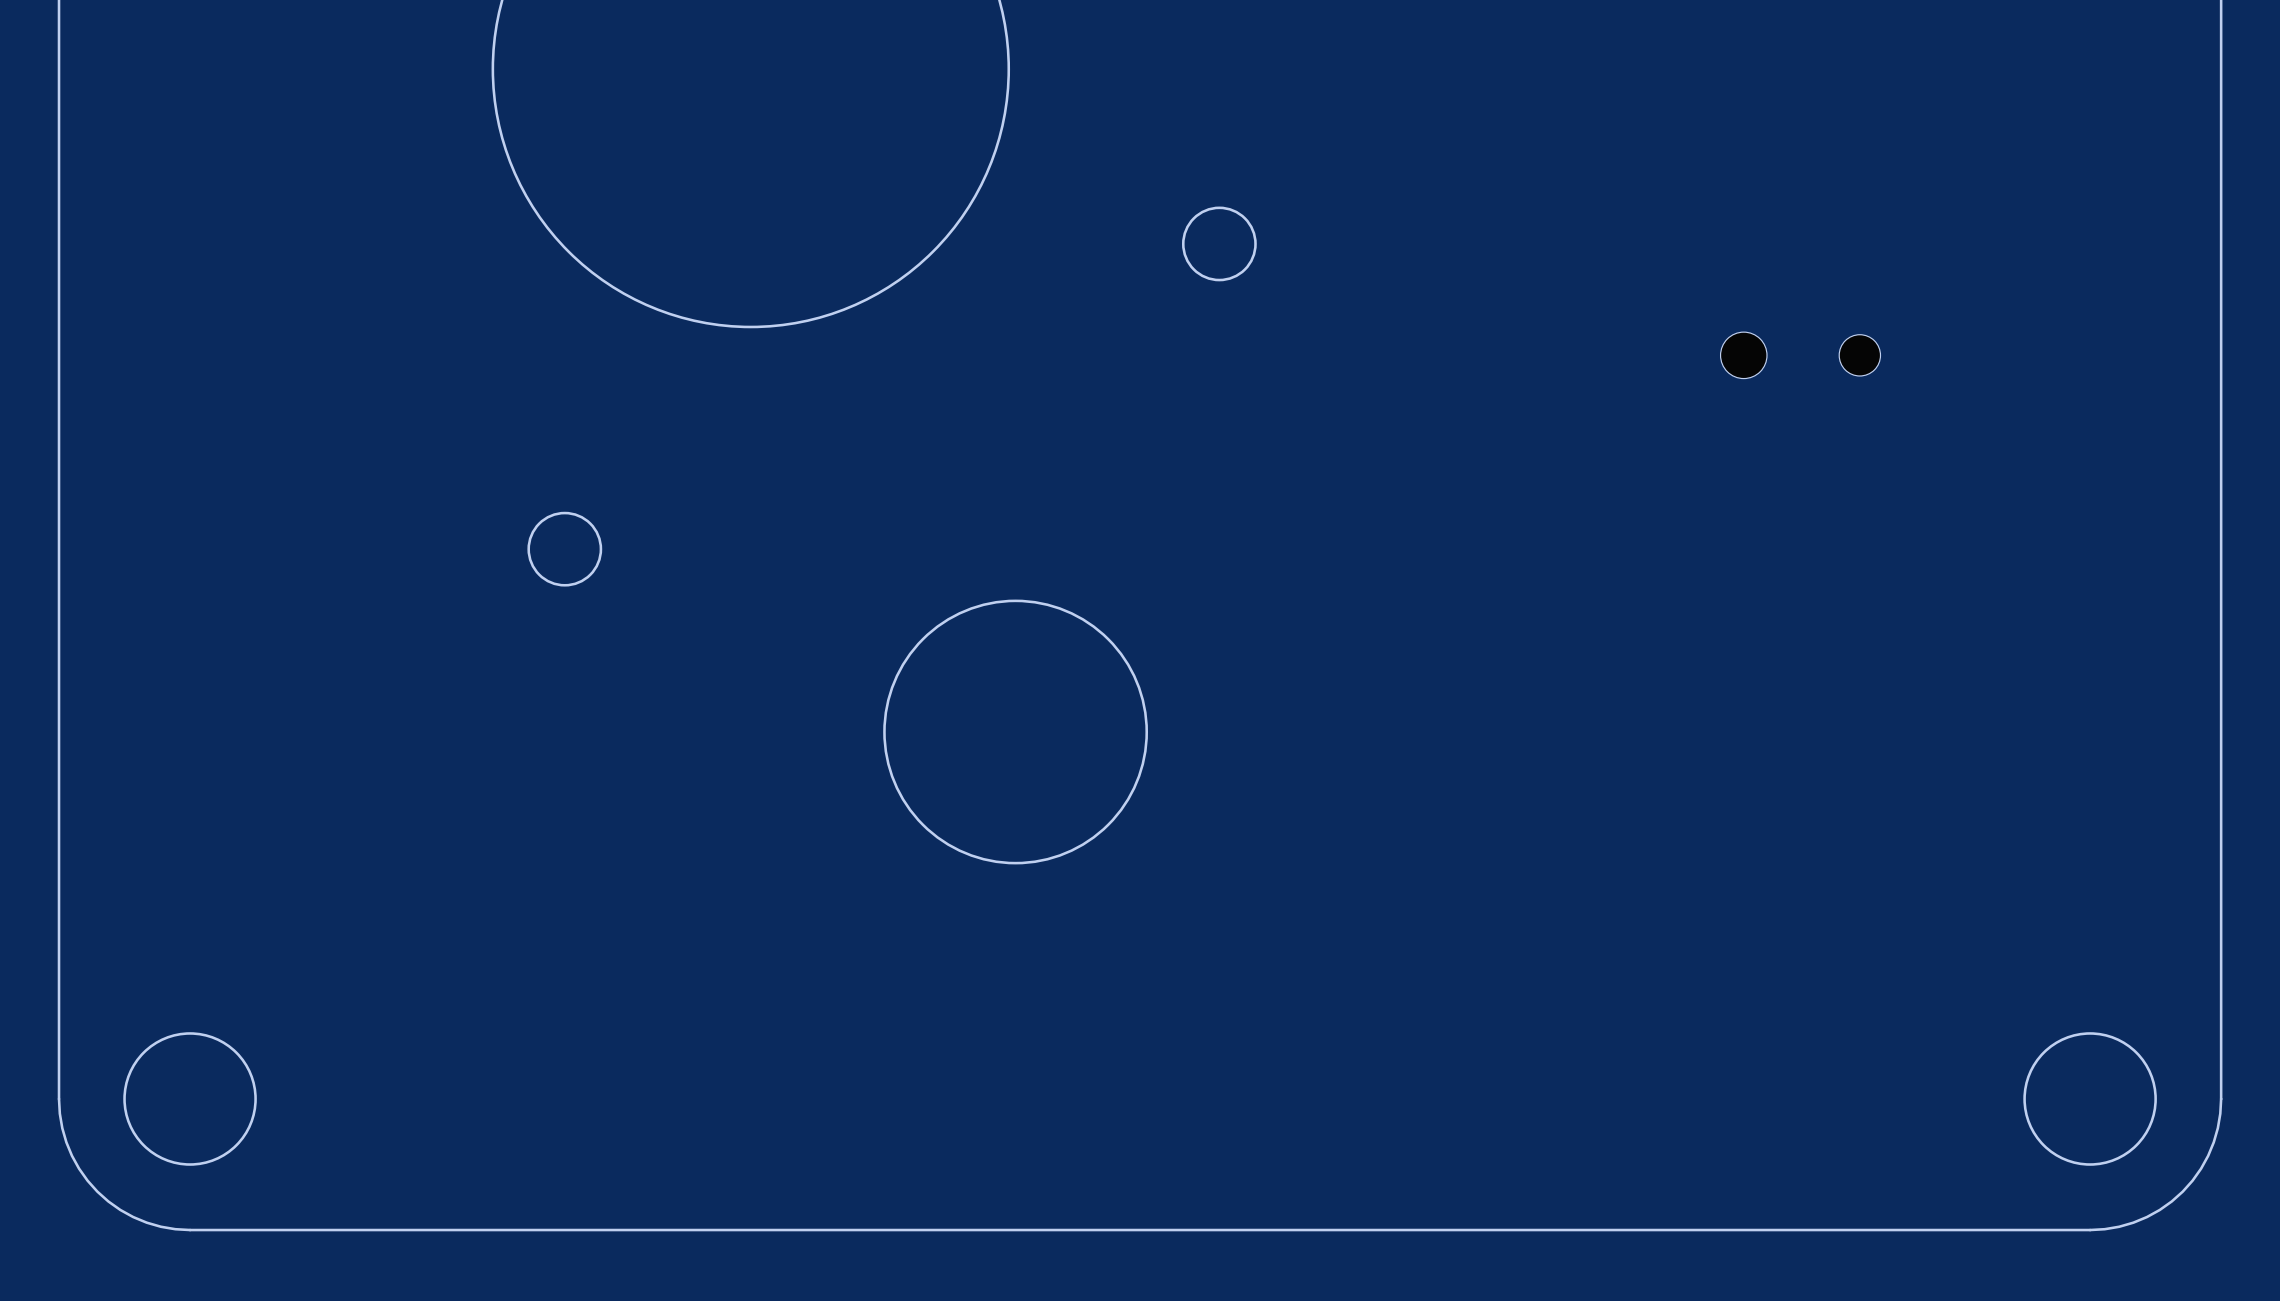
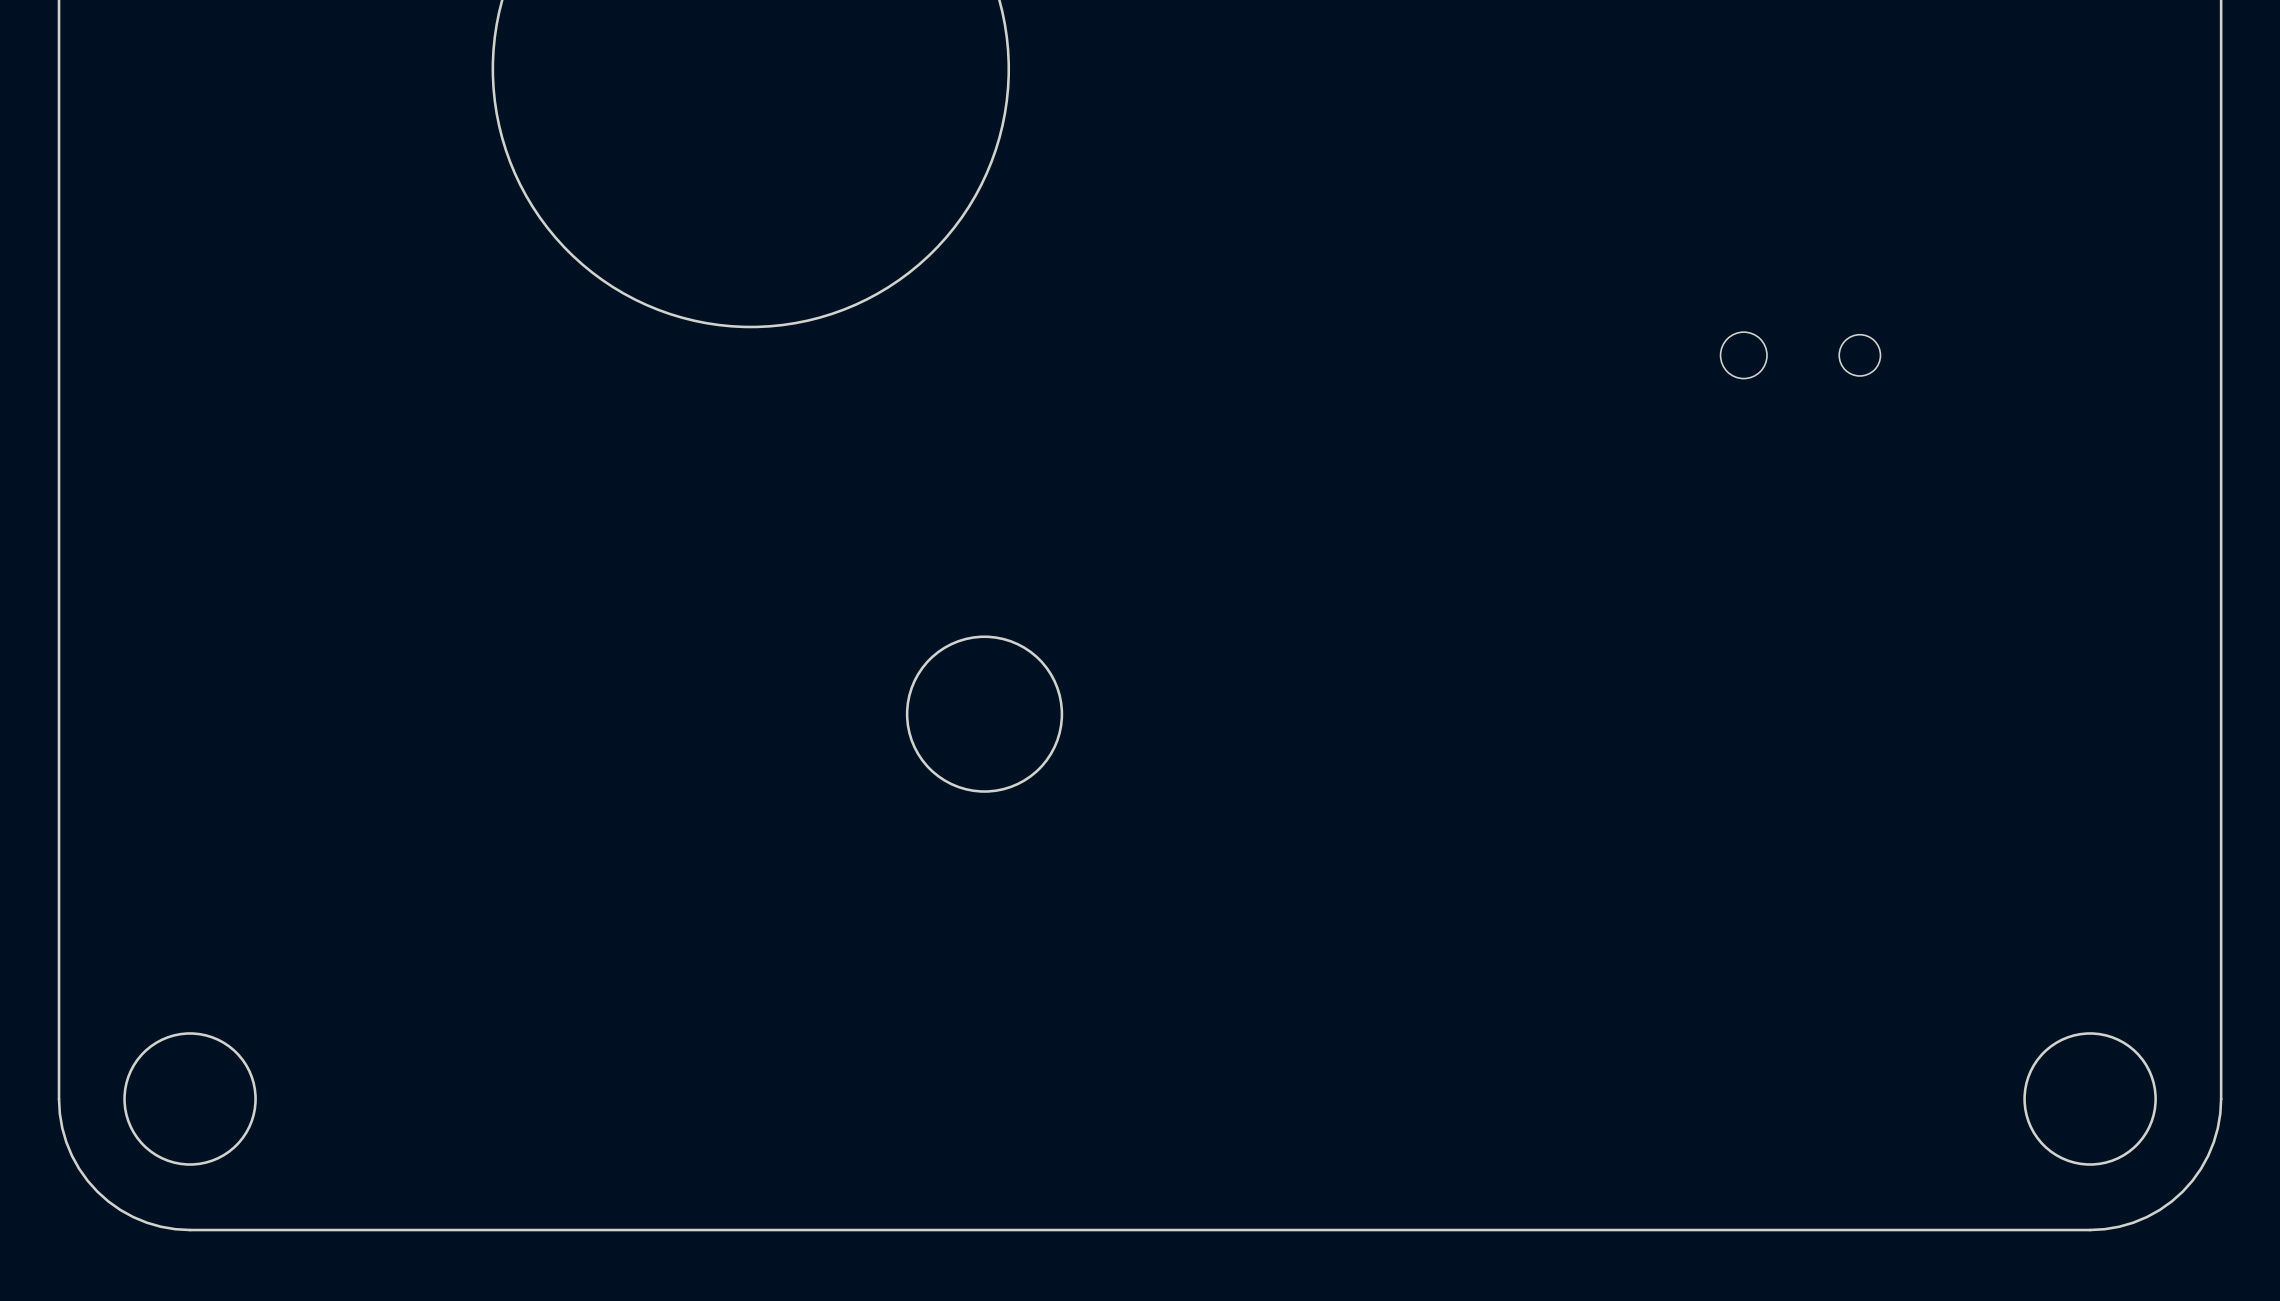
round board edge: [1181, 206, 1257, 282] -> none
round board edge: [527, 511, 603, 587] -> none
round board edge: [883, 599, 1149, 865] -> none
round board edge: none -> [905, 635, 1064, 793]

